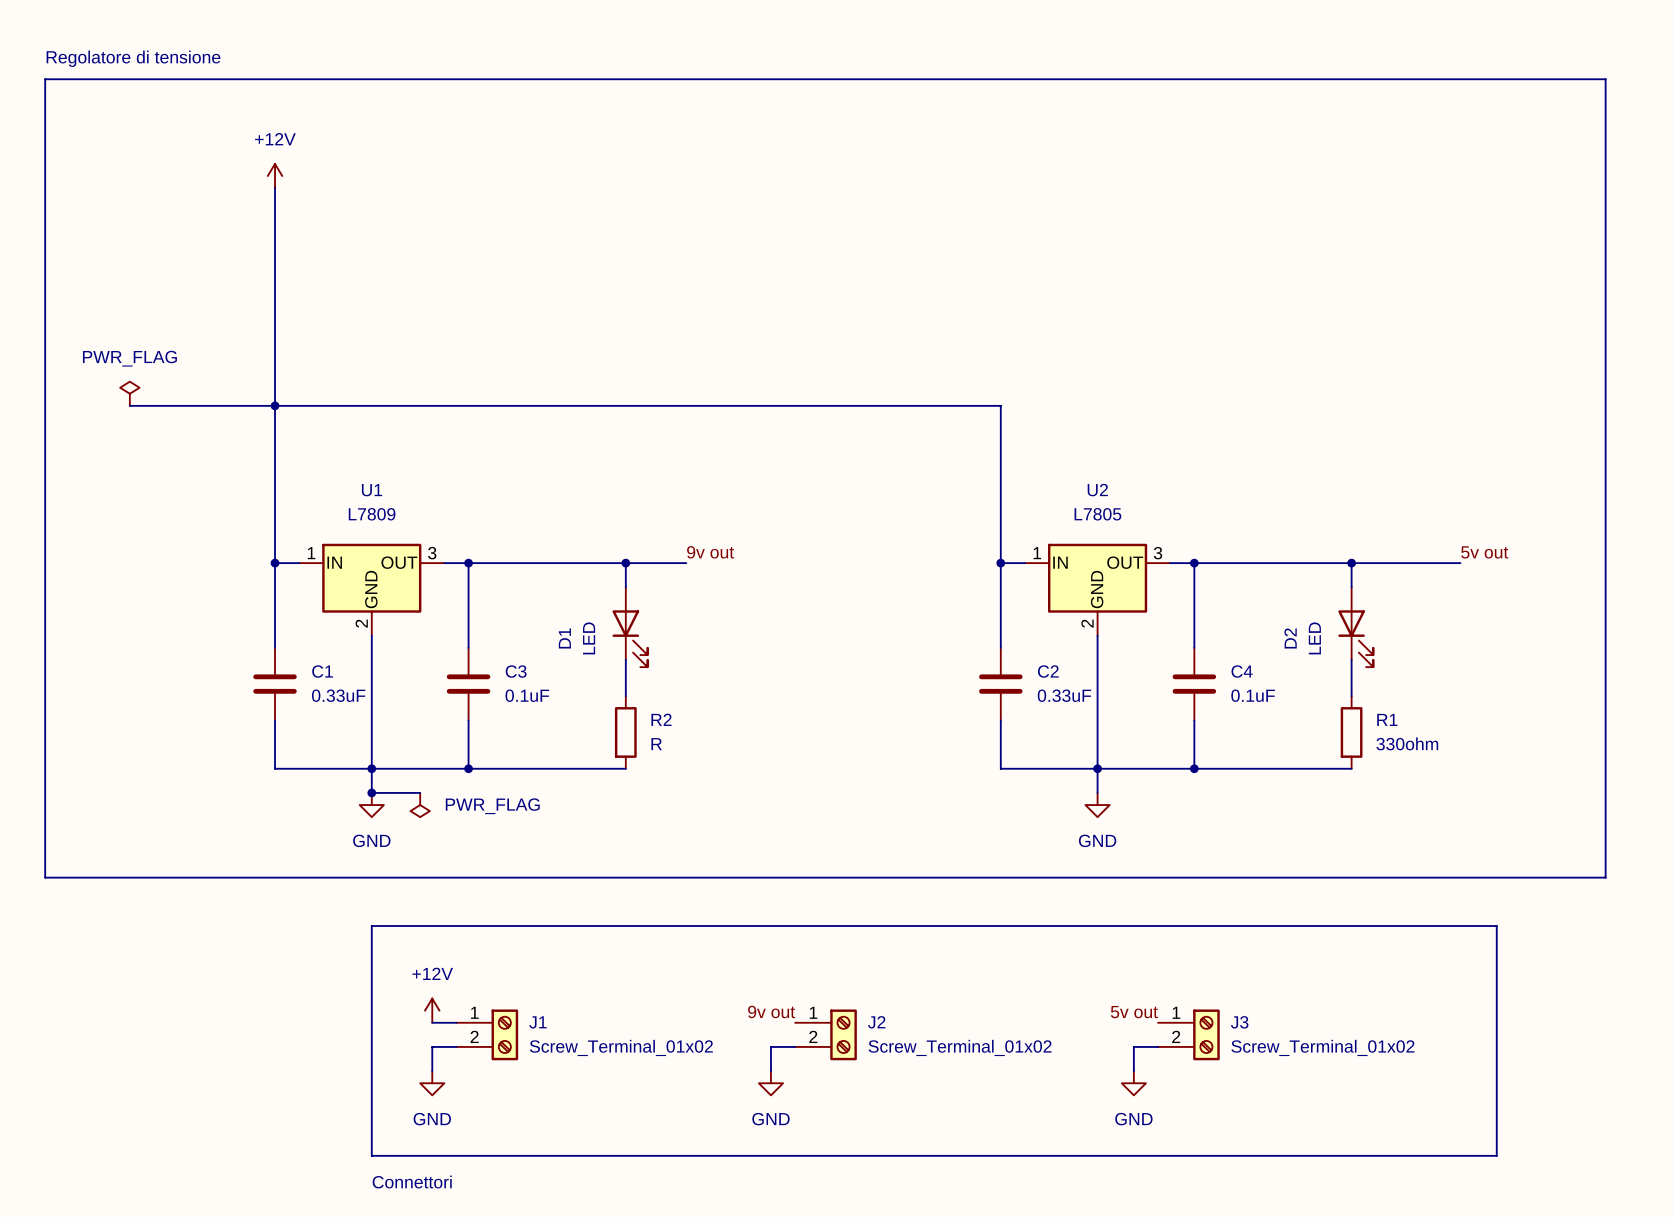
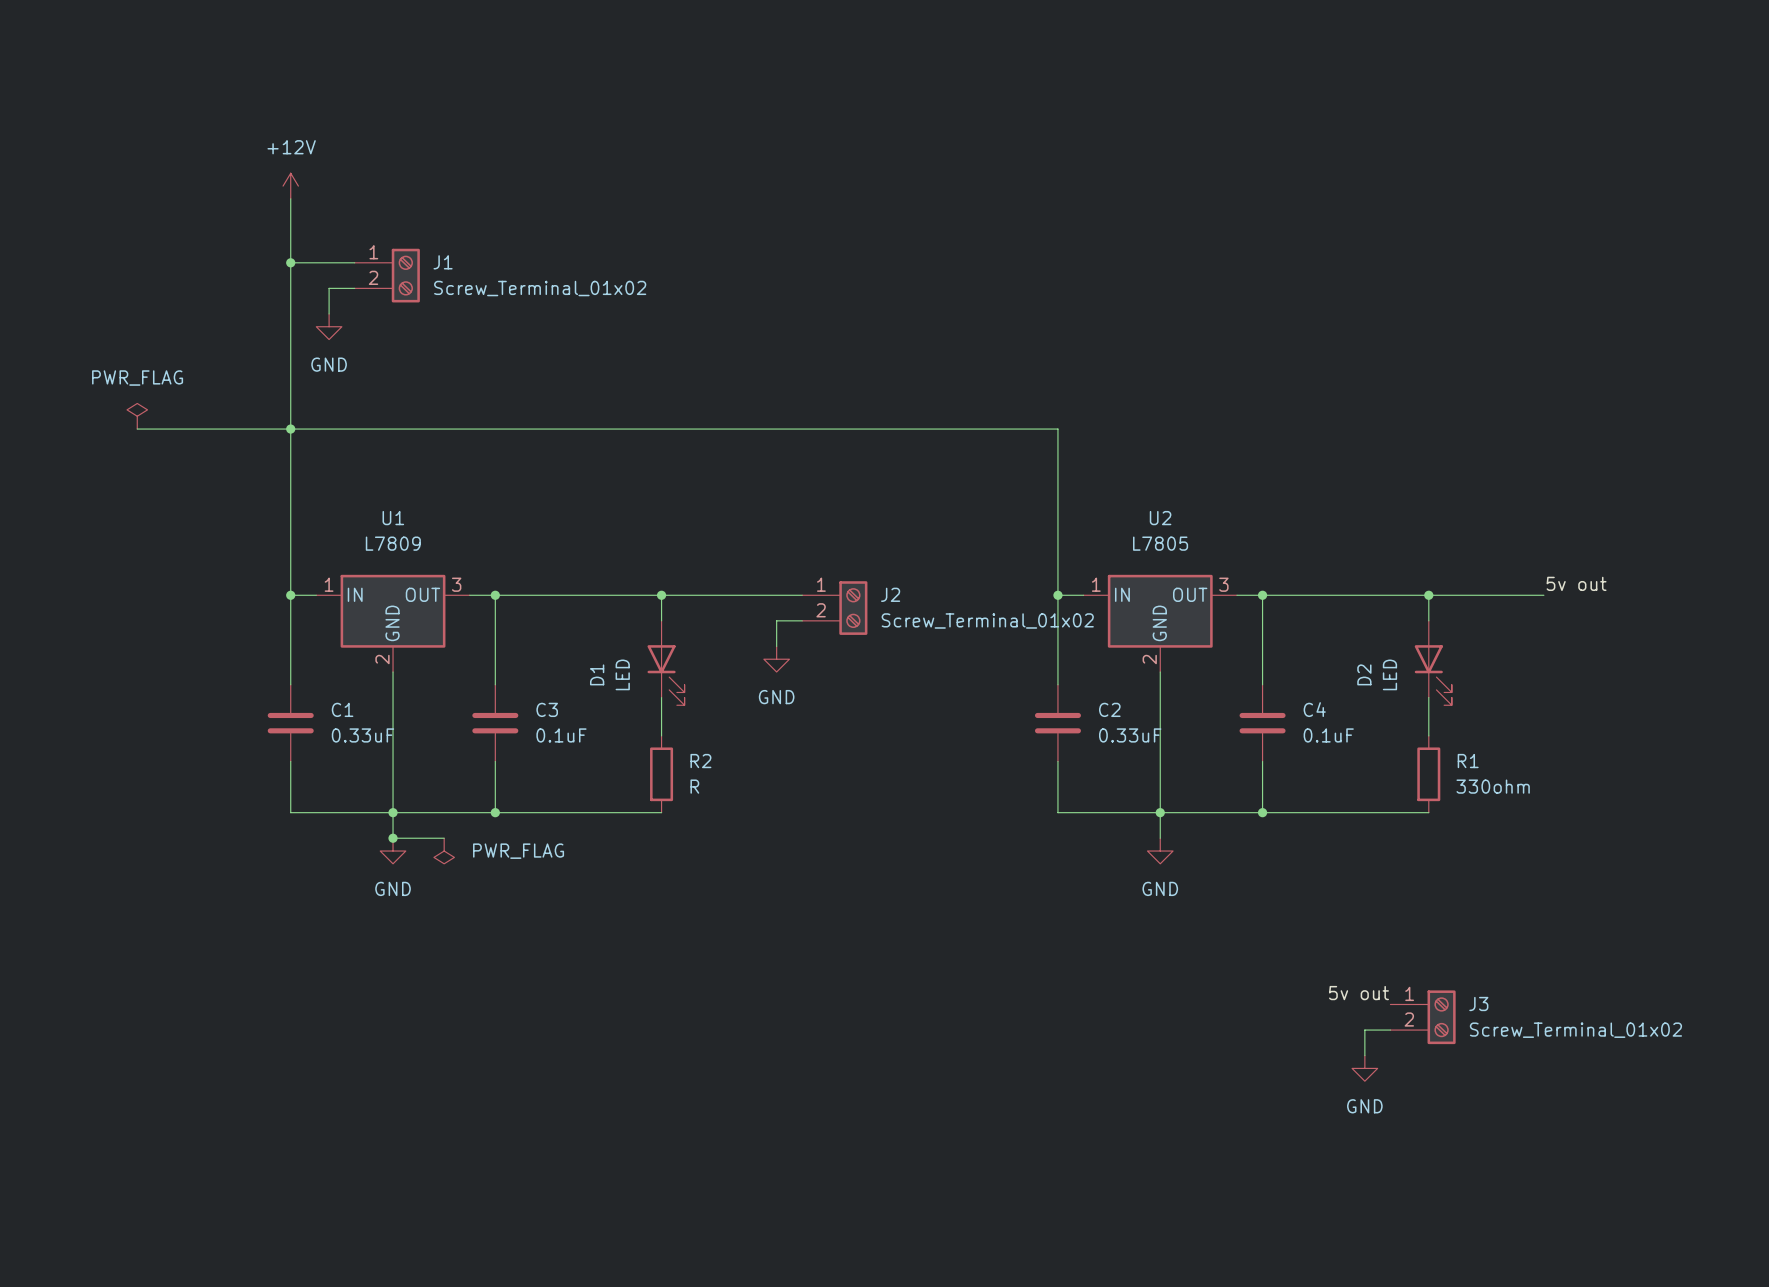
text: Regolatore di tensione (133, 58) -> none
line: (45, 79) (1605, 79) (1605, 877) (45, 877) (45, 79) -> none
wire: none -> (290, 262) (354, 262)
junction: none -> (290, 262)
wire: none -> (354, 288) (329, 288) (329, 313)
power symbol: none -> GND (329, 326)
label: 9v out (710, 552) -> none
wire: none -> (725, 595) (802, 595)
wire: none -> (802, 620) (776, 620) (776, 646)
power symbol: none -> GND (776, 659)
line: (371, 926) (1496, 926) (1496, 1155) (371, 1155) (371, 926) -> none
power symbol: +12V (432, 1010) -> none
label: 9v out (771, 1011) -> none
label position: 5v out (1134, 1012) -> 5v out (1358, 993)
wire: (432, 1022) (456, 1022) -> none
J1 position: (487, 1034) -> (387, 275)
J2 position: (826, 1034) -> (834, 608)
J3 position: (1188, 1034) -> (1423, 1017)
wire: (456, 1046) (432, 1046) (432, 1071) -> none
wire: (795, 1046) (770, 1046) (770, 1071) -> none
wire: (1158, 1046) (1133, 1046) (1133, 1071) -> (1390, 1030) (1364, 1030) (1364, 1055)
power symbol: GND (432, 1083) -> none
power symbol: GND (770, 1083) -> none
power symbol position: GND (1133, 1083) -> GND (1364, 1068)
text: Connettori (412, 1181) -> none

